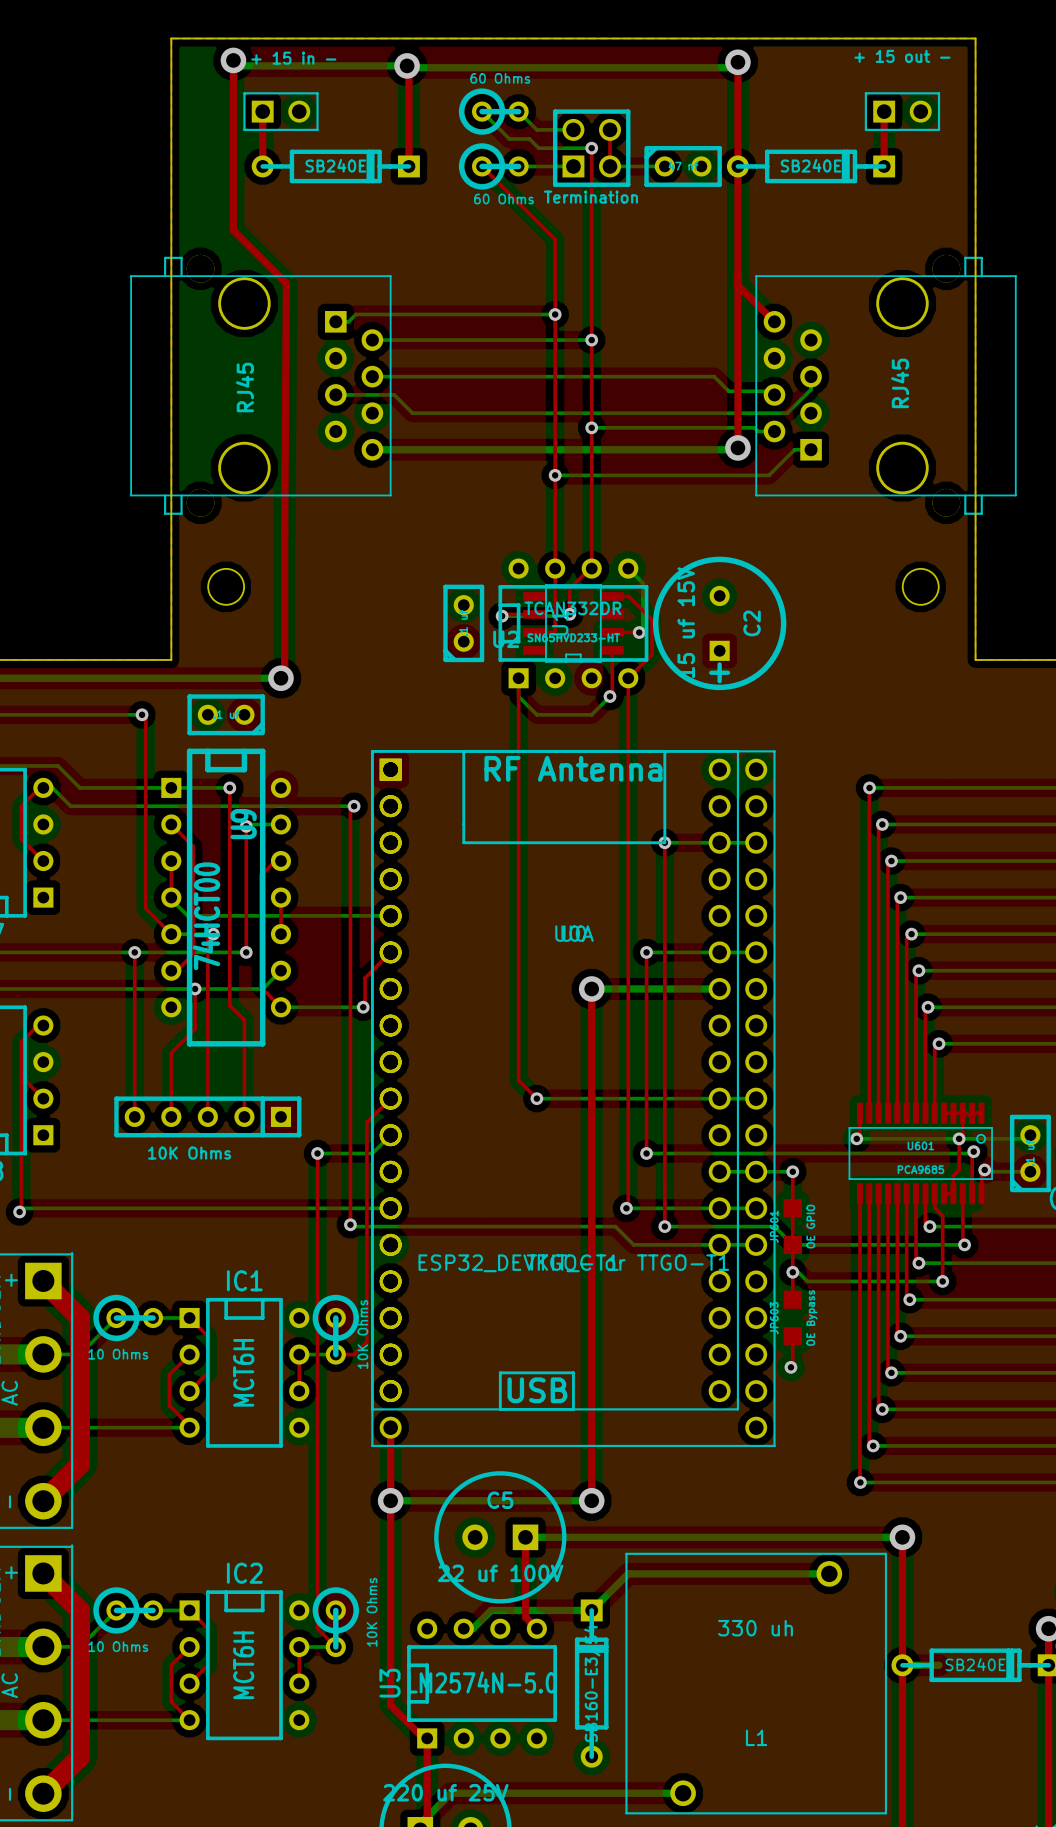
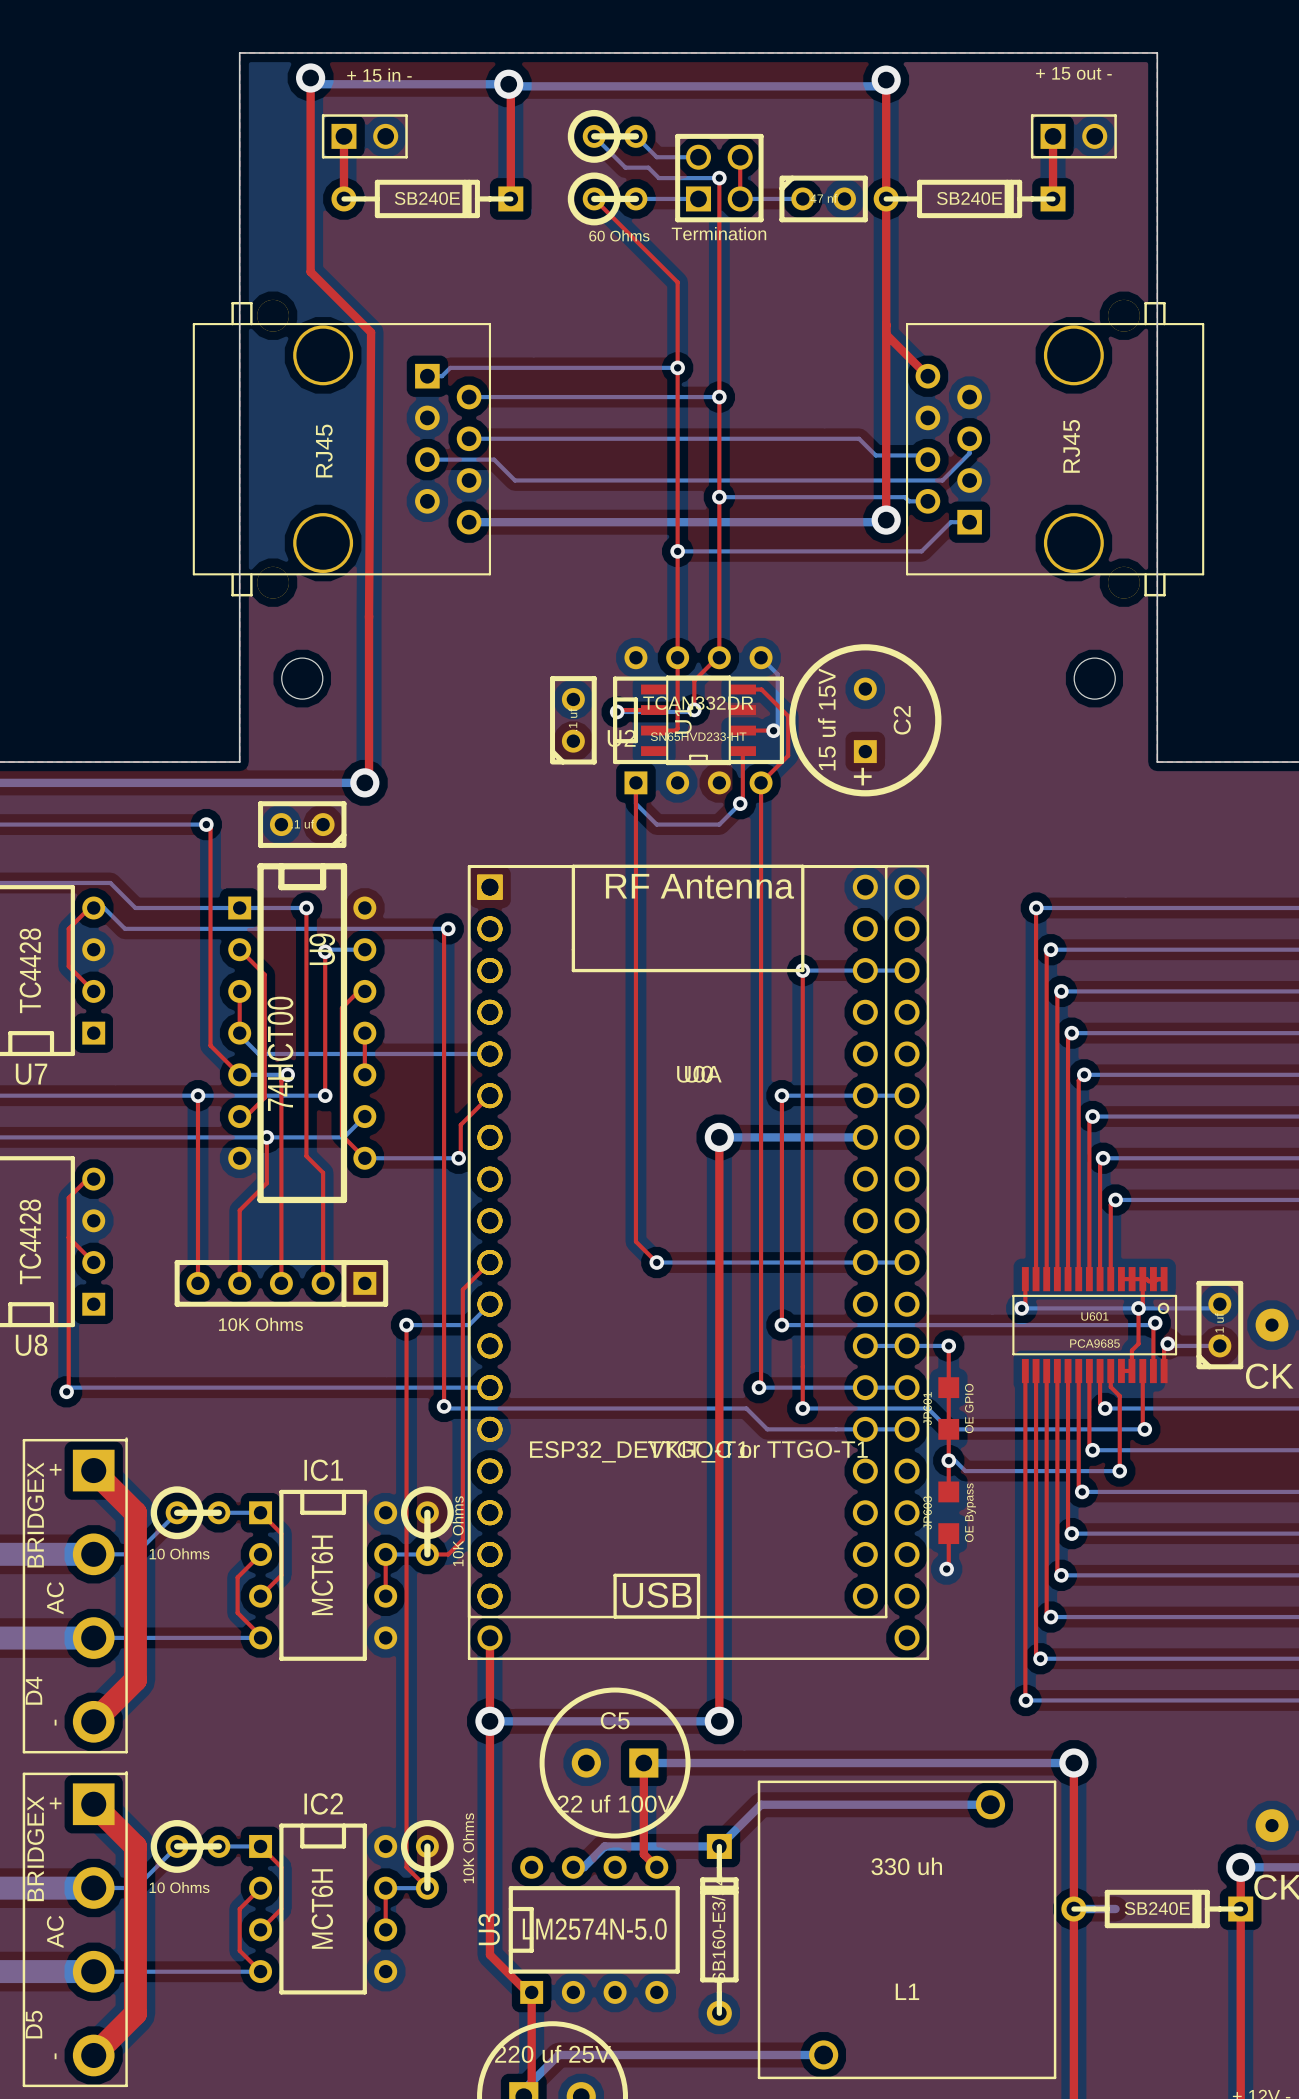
part value: 60 Ohms (500, 78) -> none

